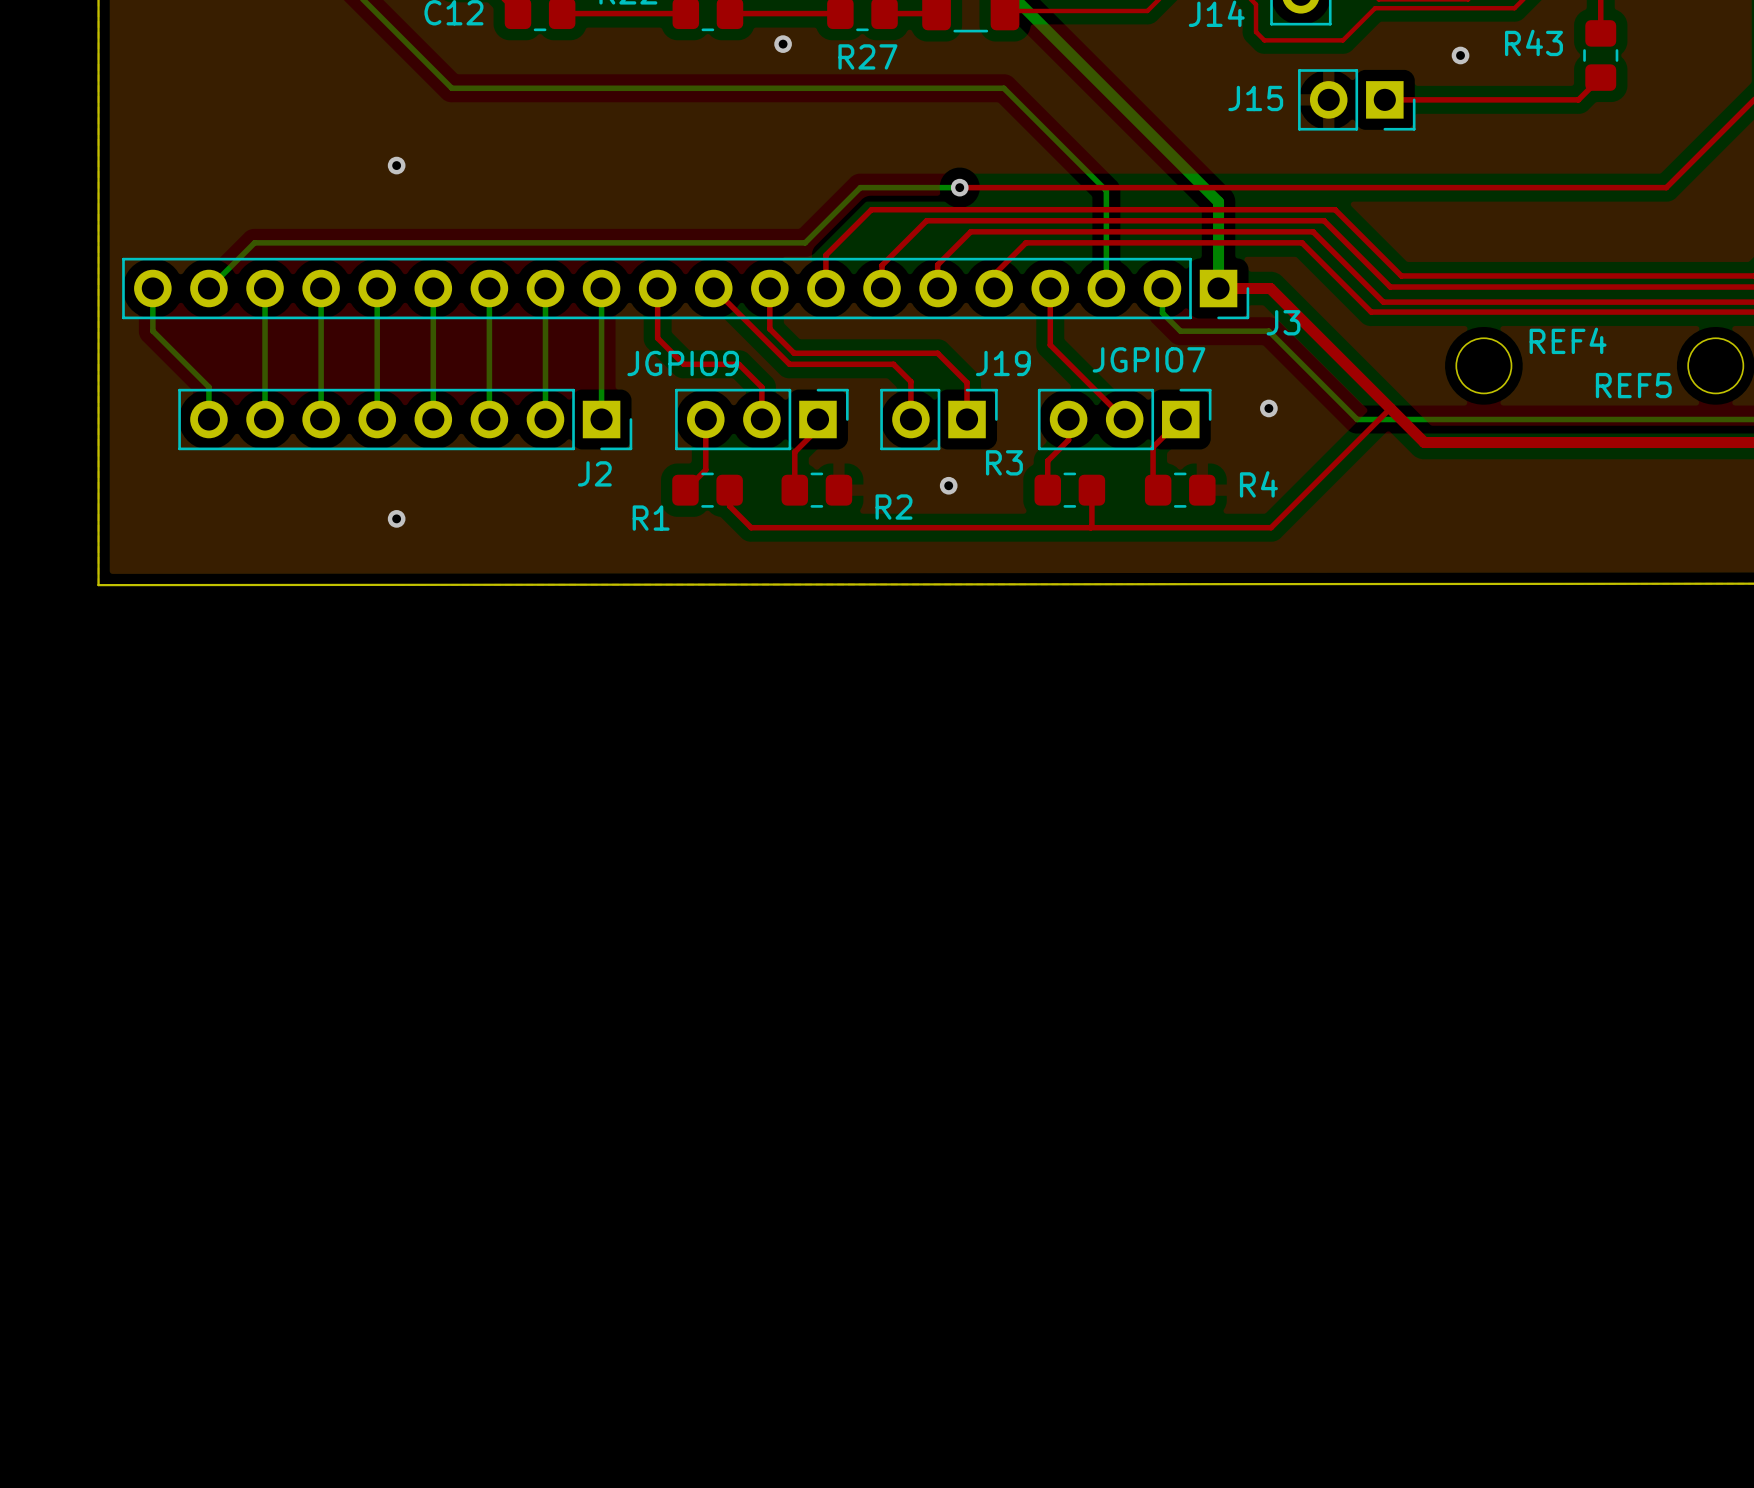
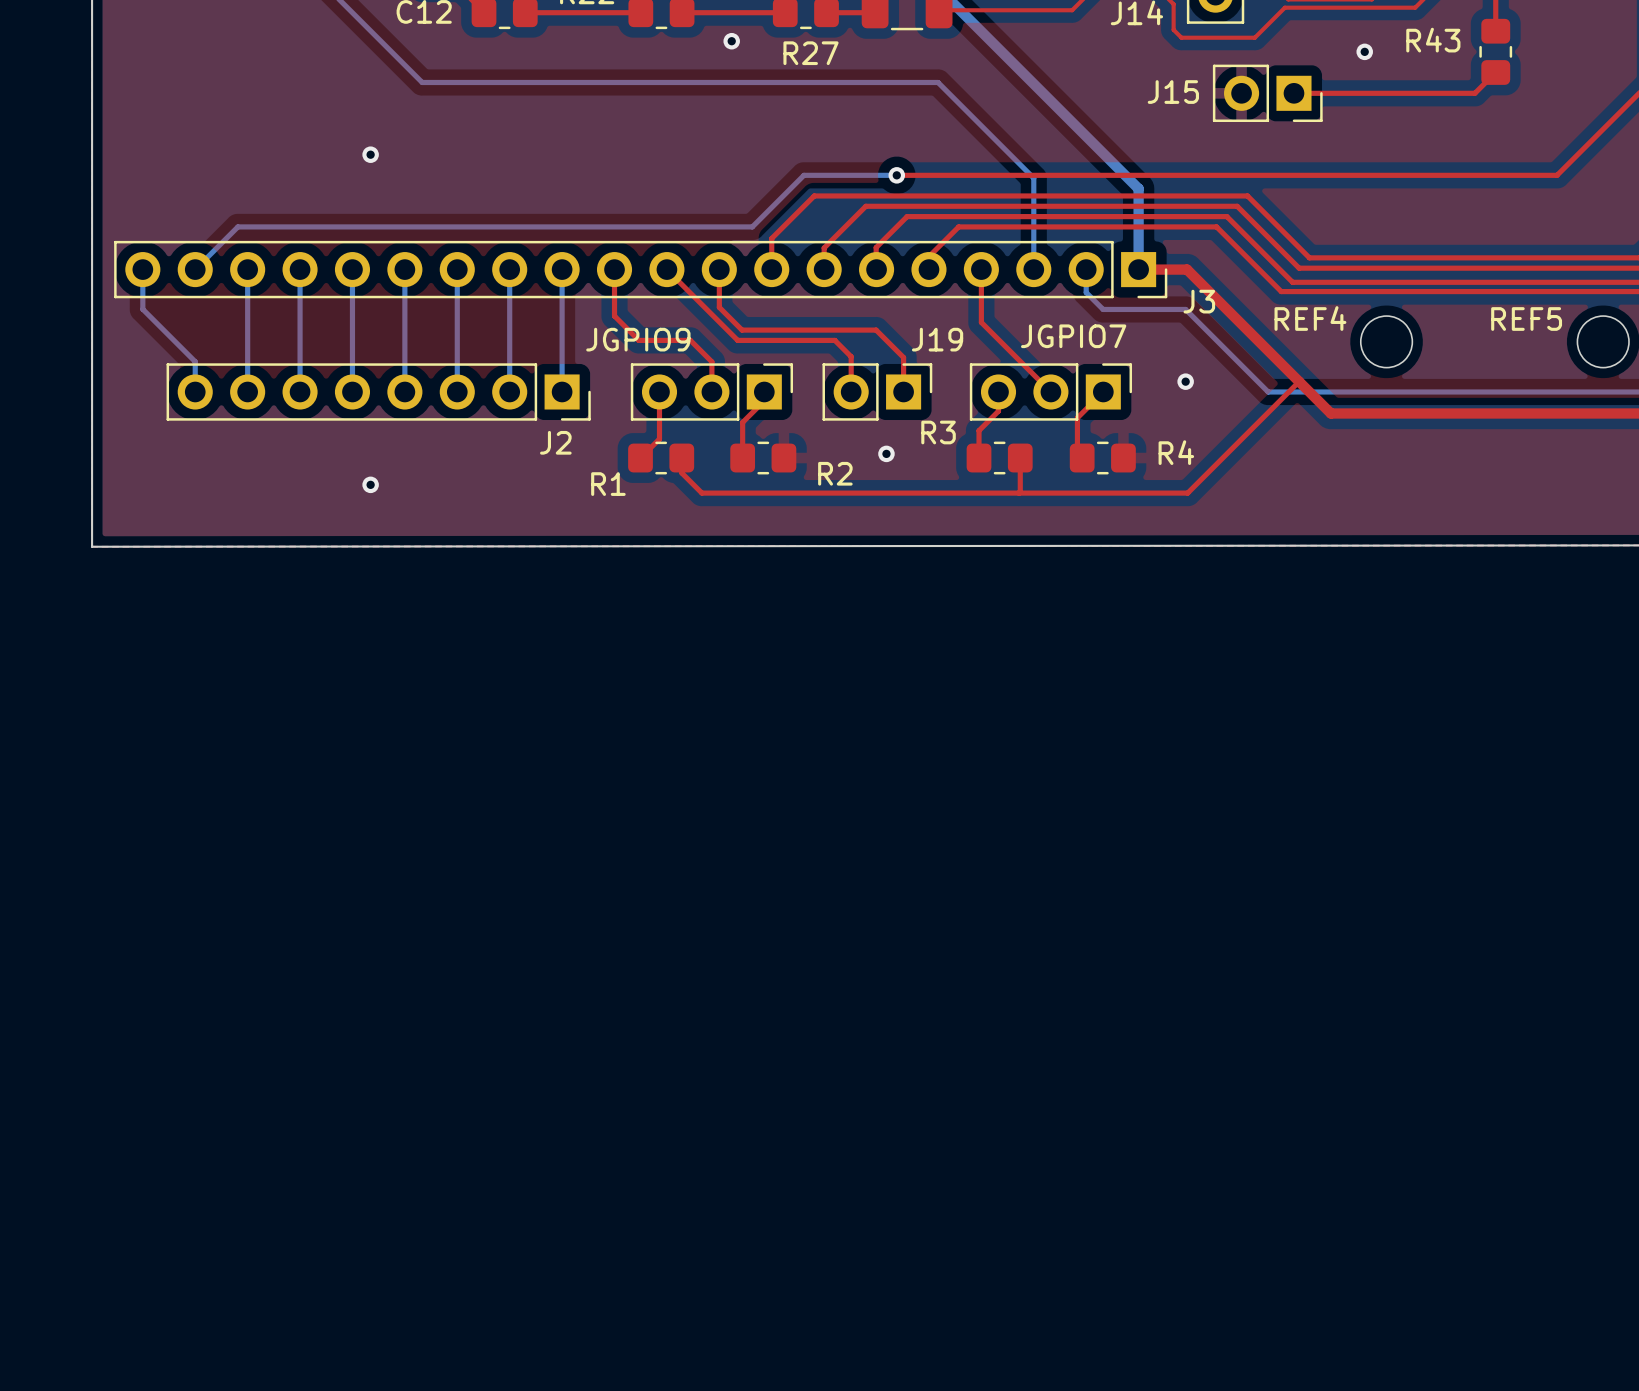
REF4 name position: REF4 (1568, 340) -> REF4 (1310, 318)
REF5 name position: REF5 (1633, 385) -> REF5 (1526, 319)

